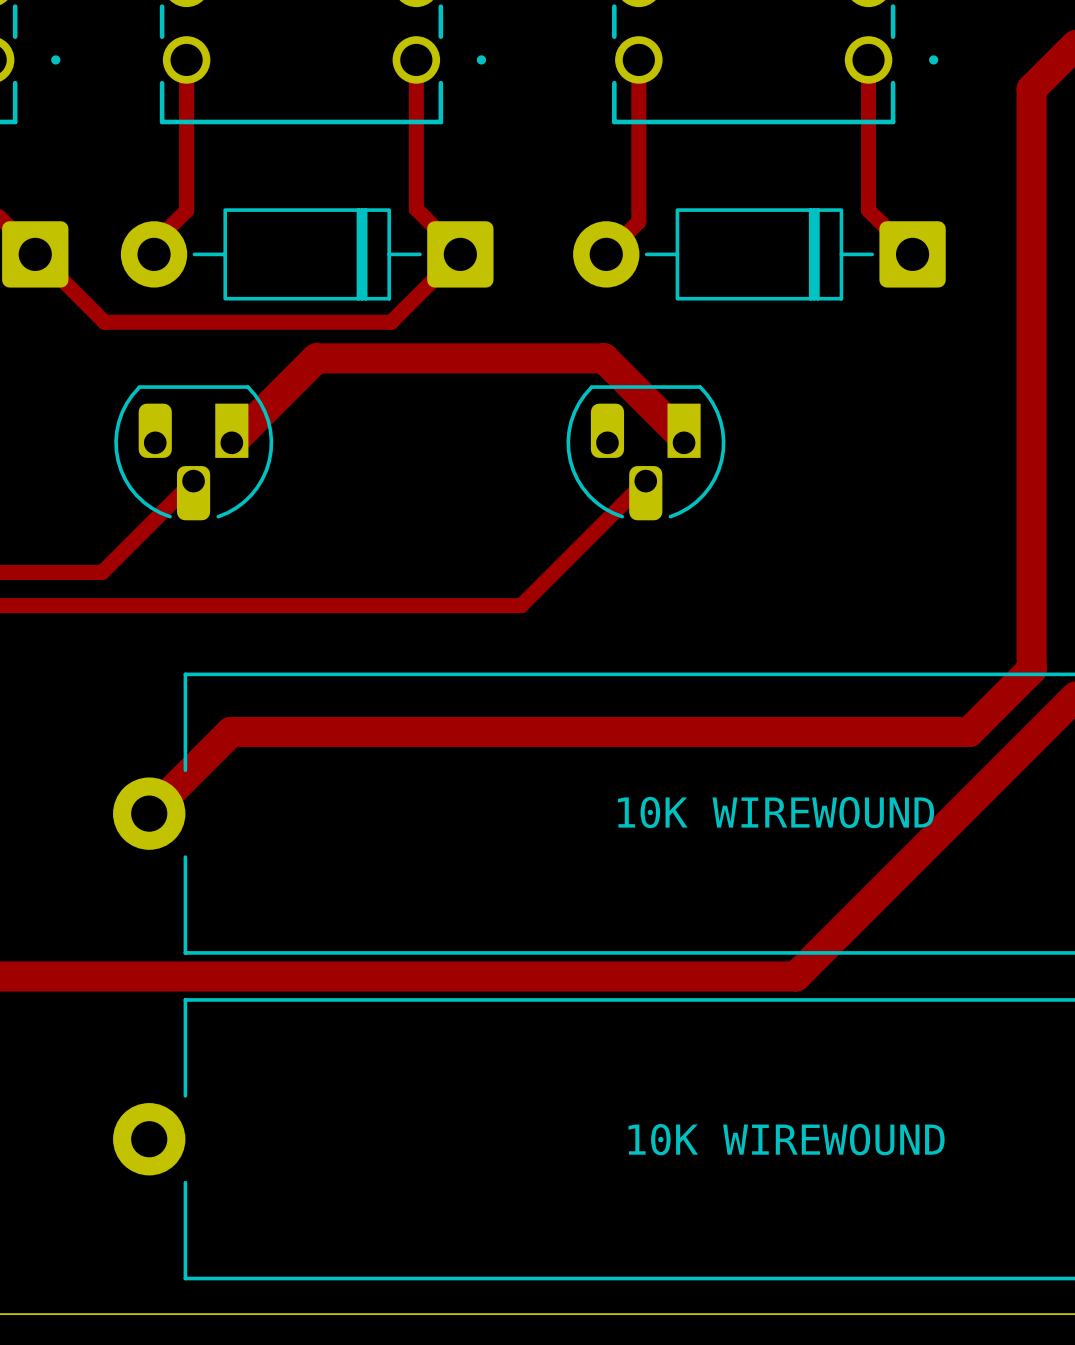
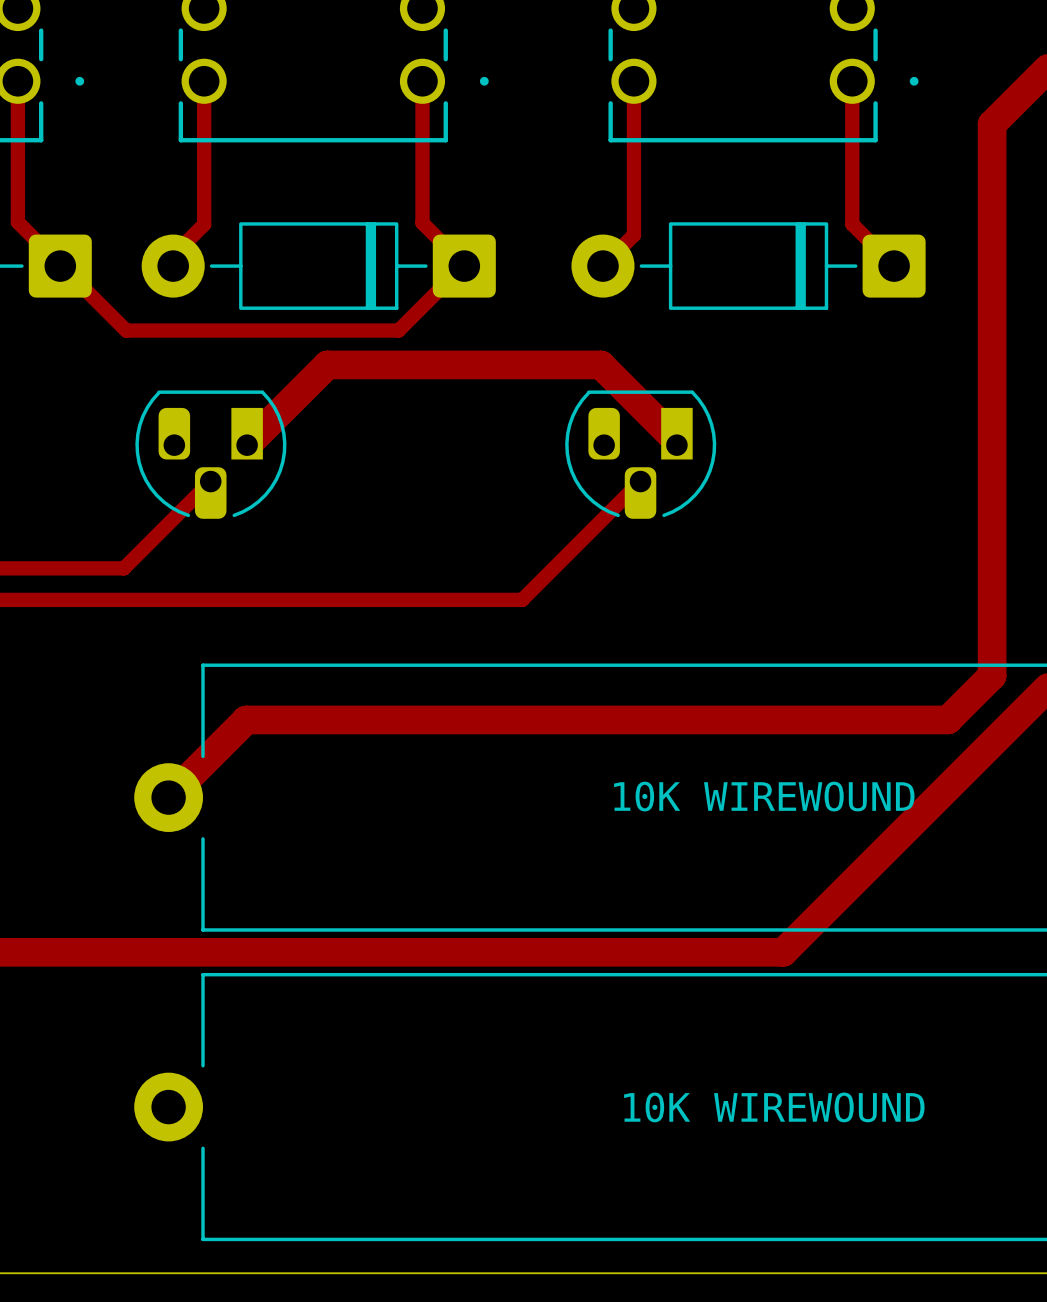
track: (1031, 89) (1031, 669) (1015, 685) -> (1007, 109) (992, 124) (992, 675)

